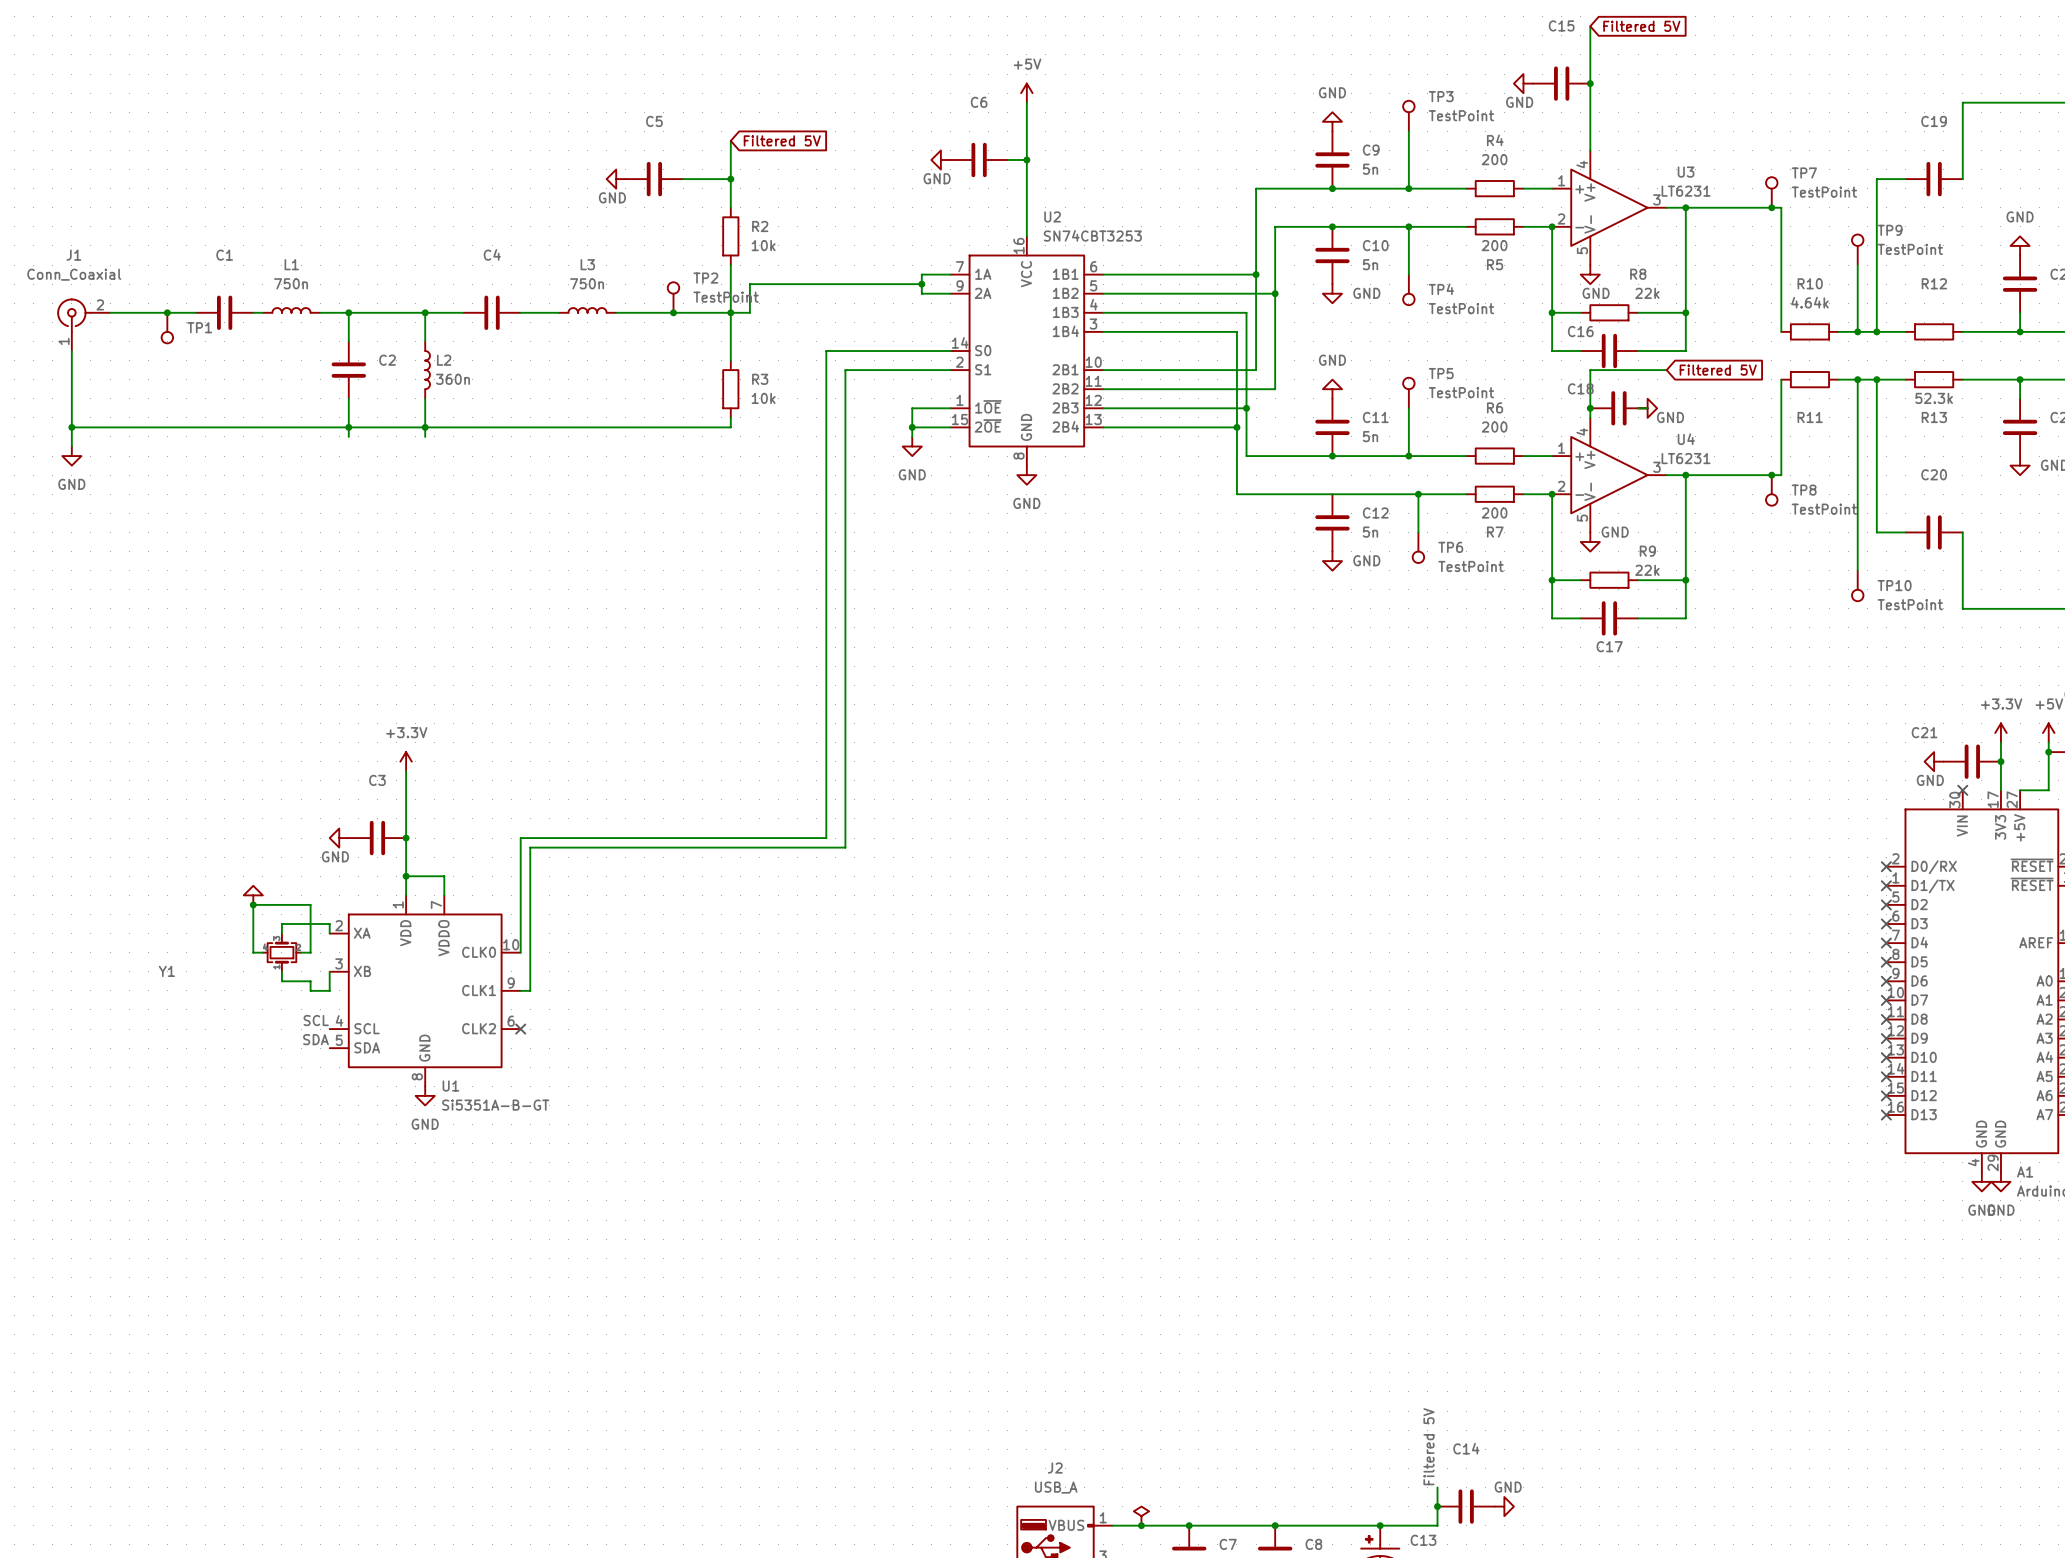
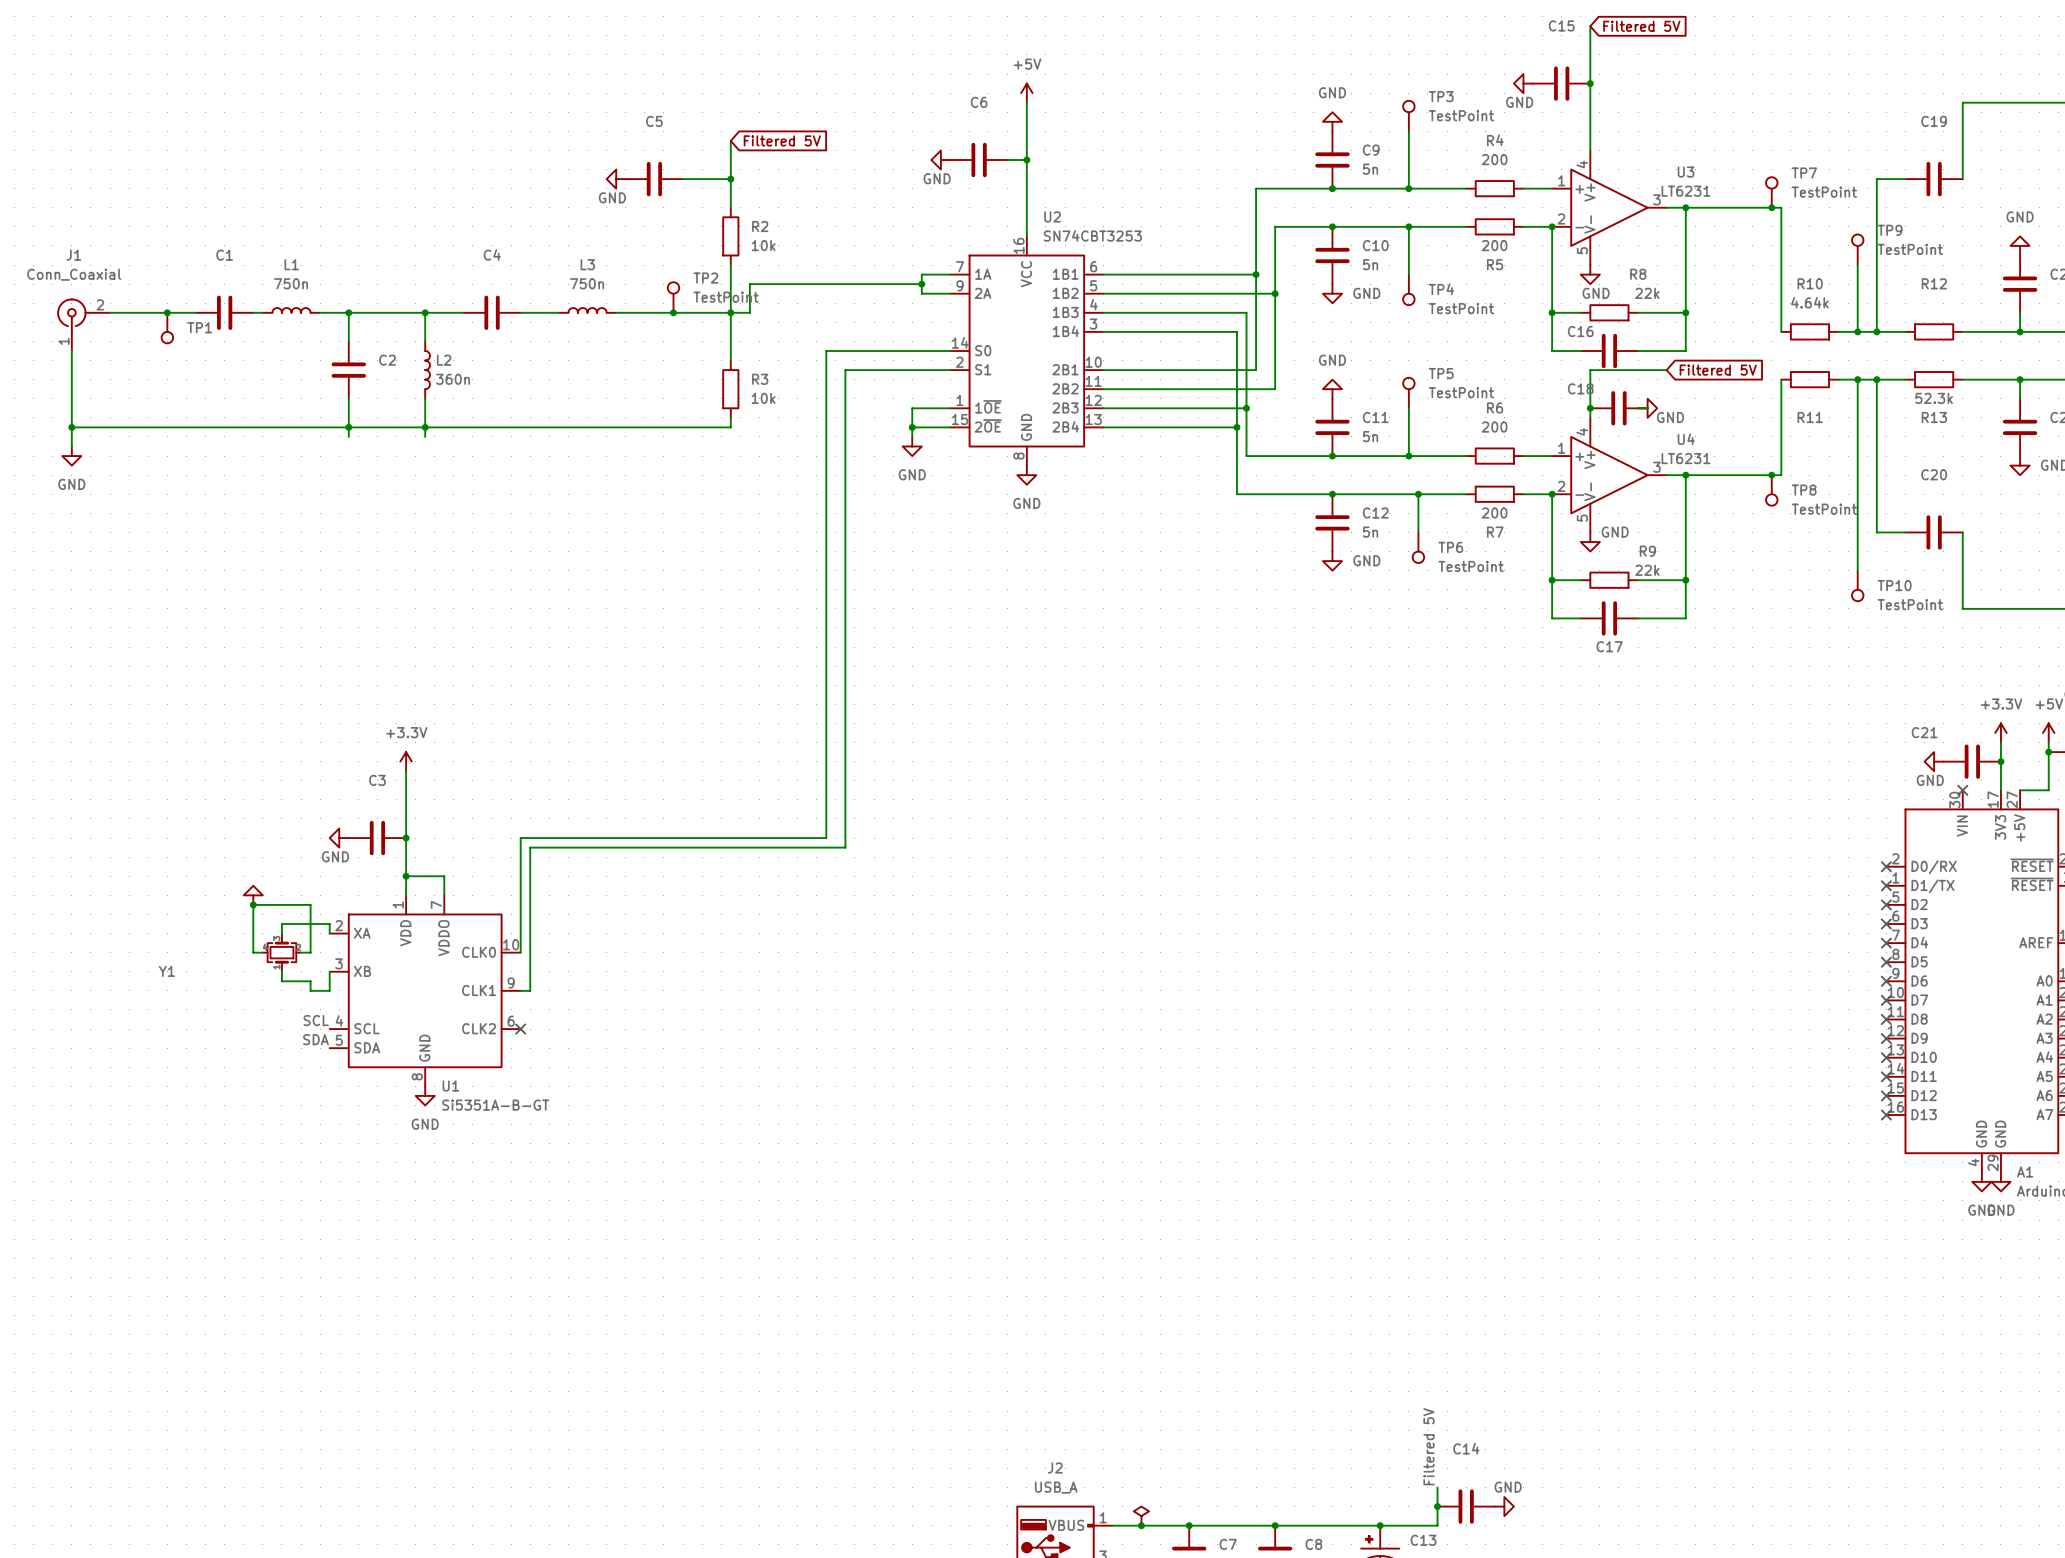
junction: none -> (1332, 494)

